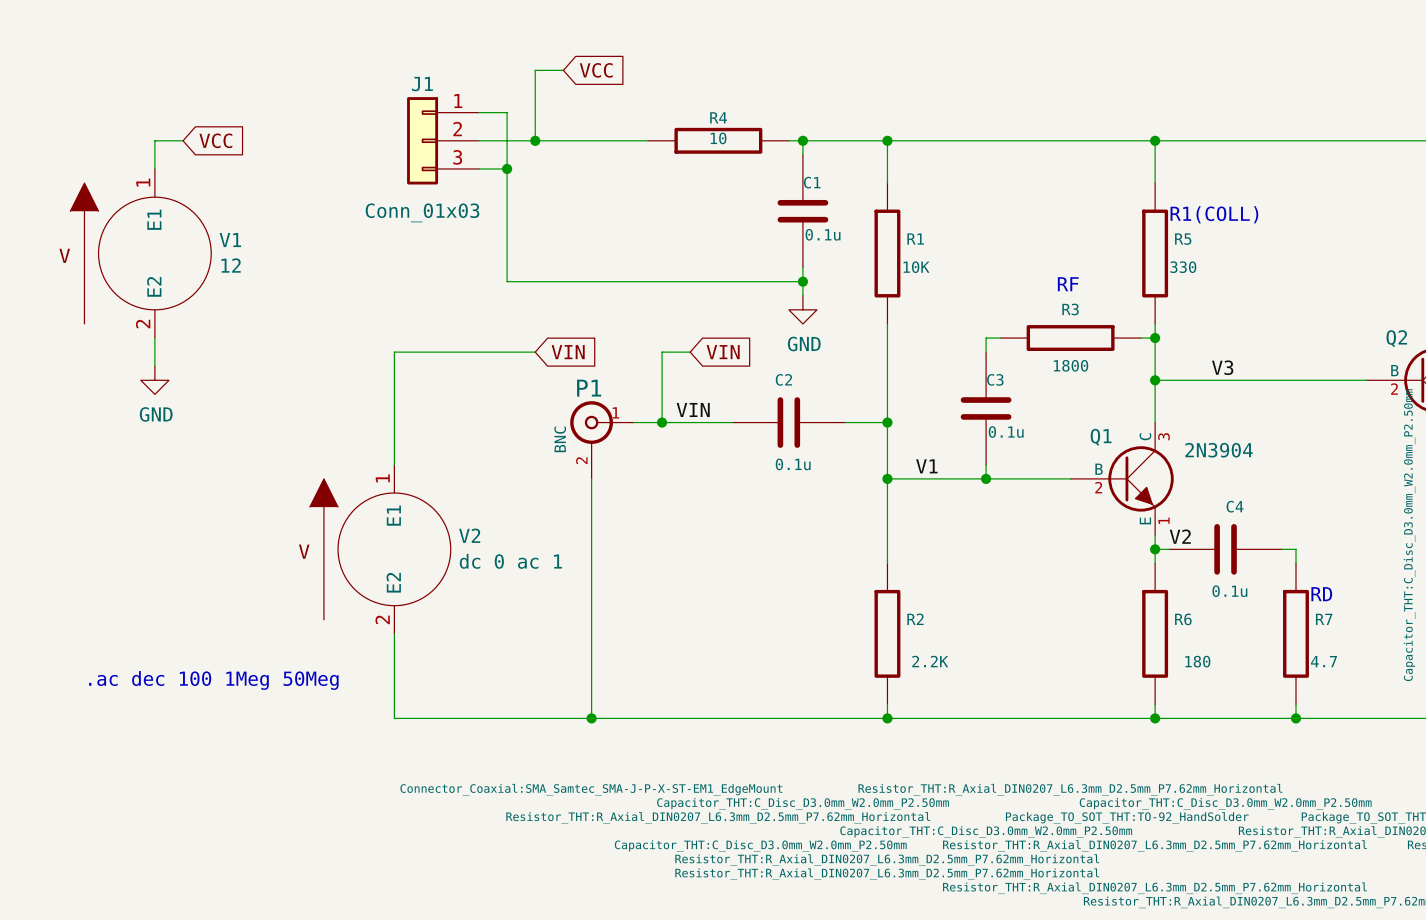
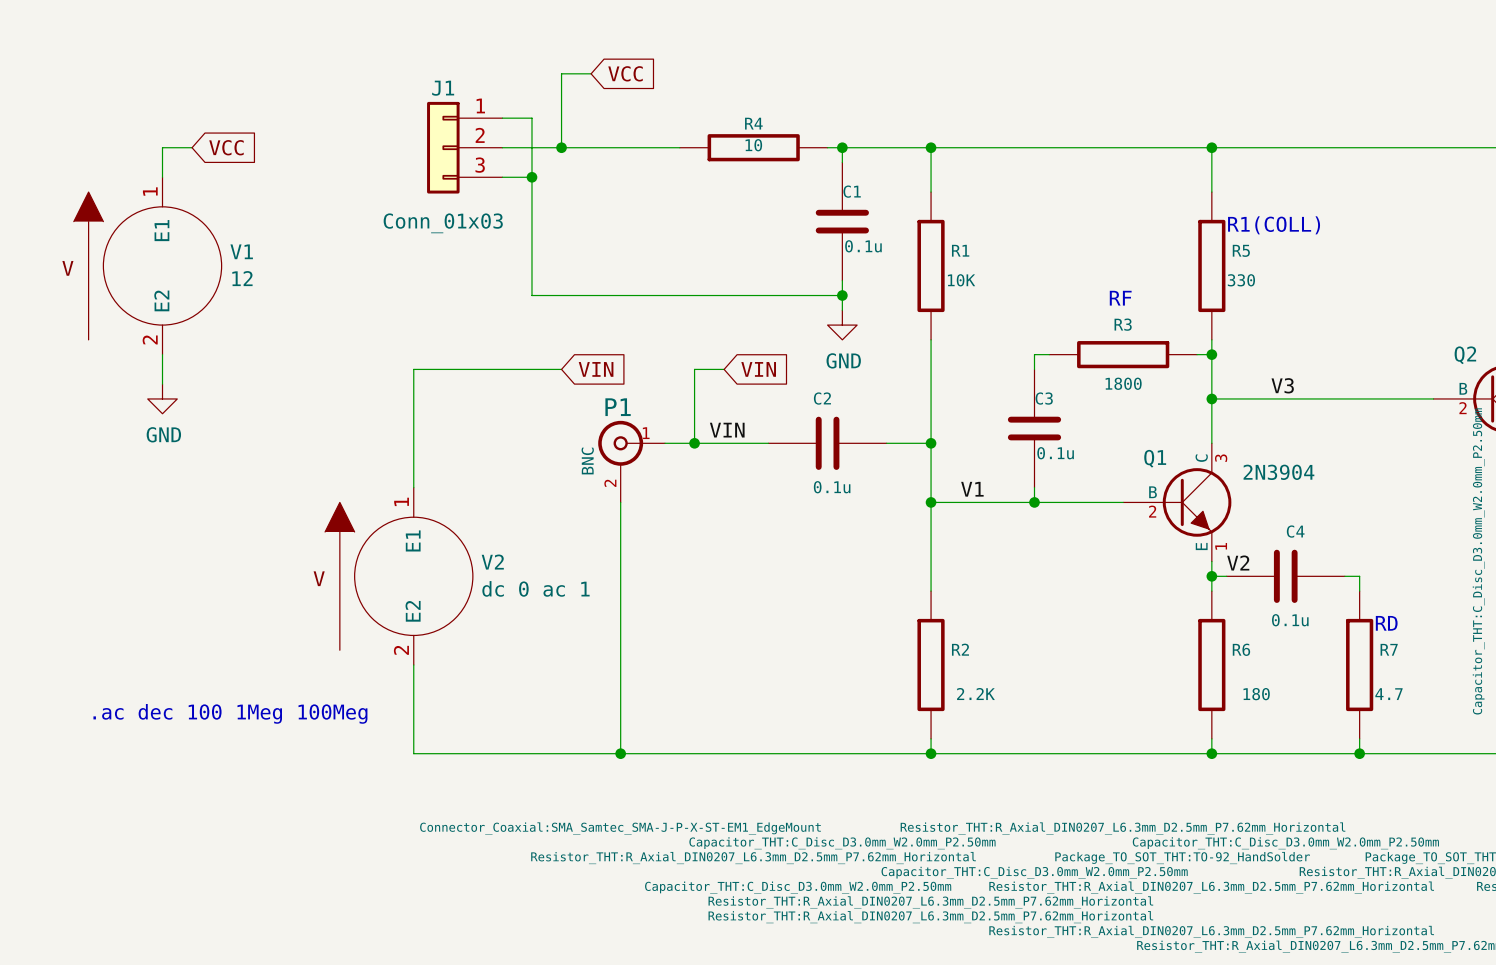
text: .ac dec 100 1Meg 50Meg (213, 680) -> .ac dec 100 1Meg 100Meg (230, 713)

